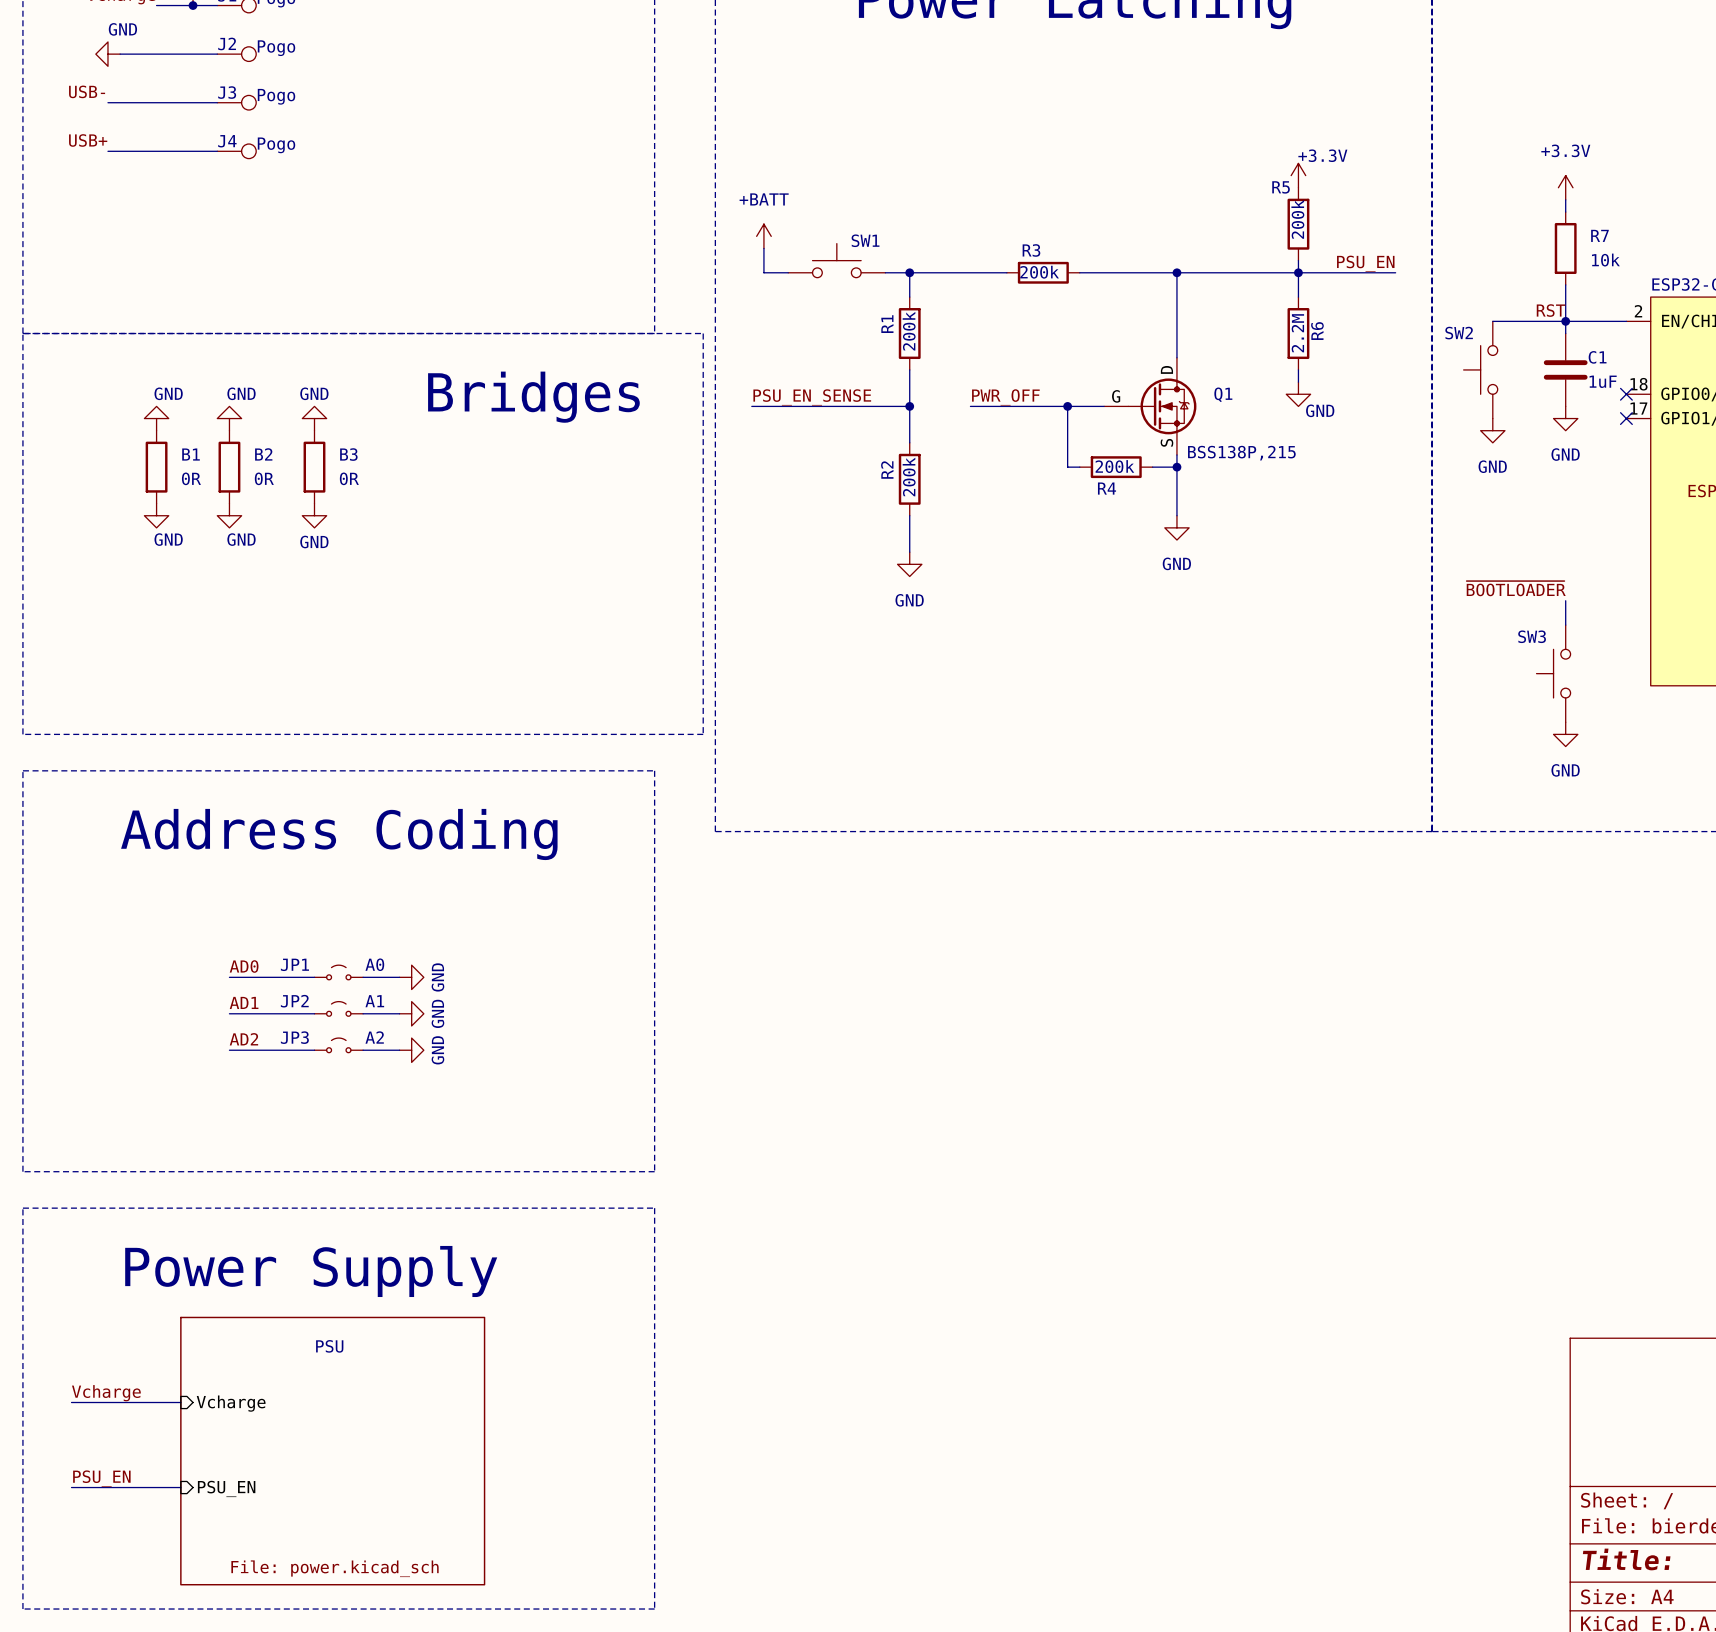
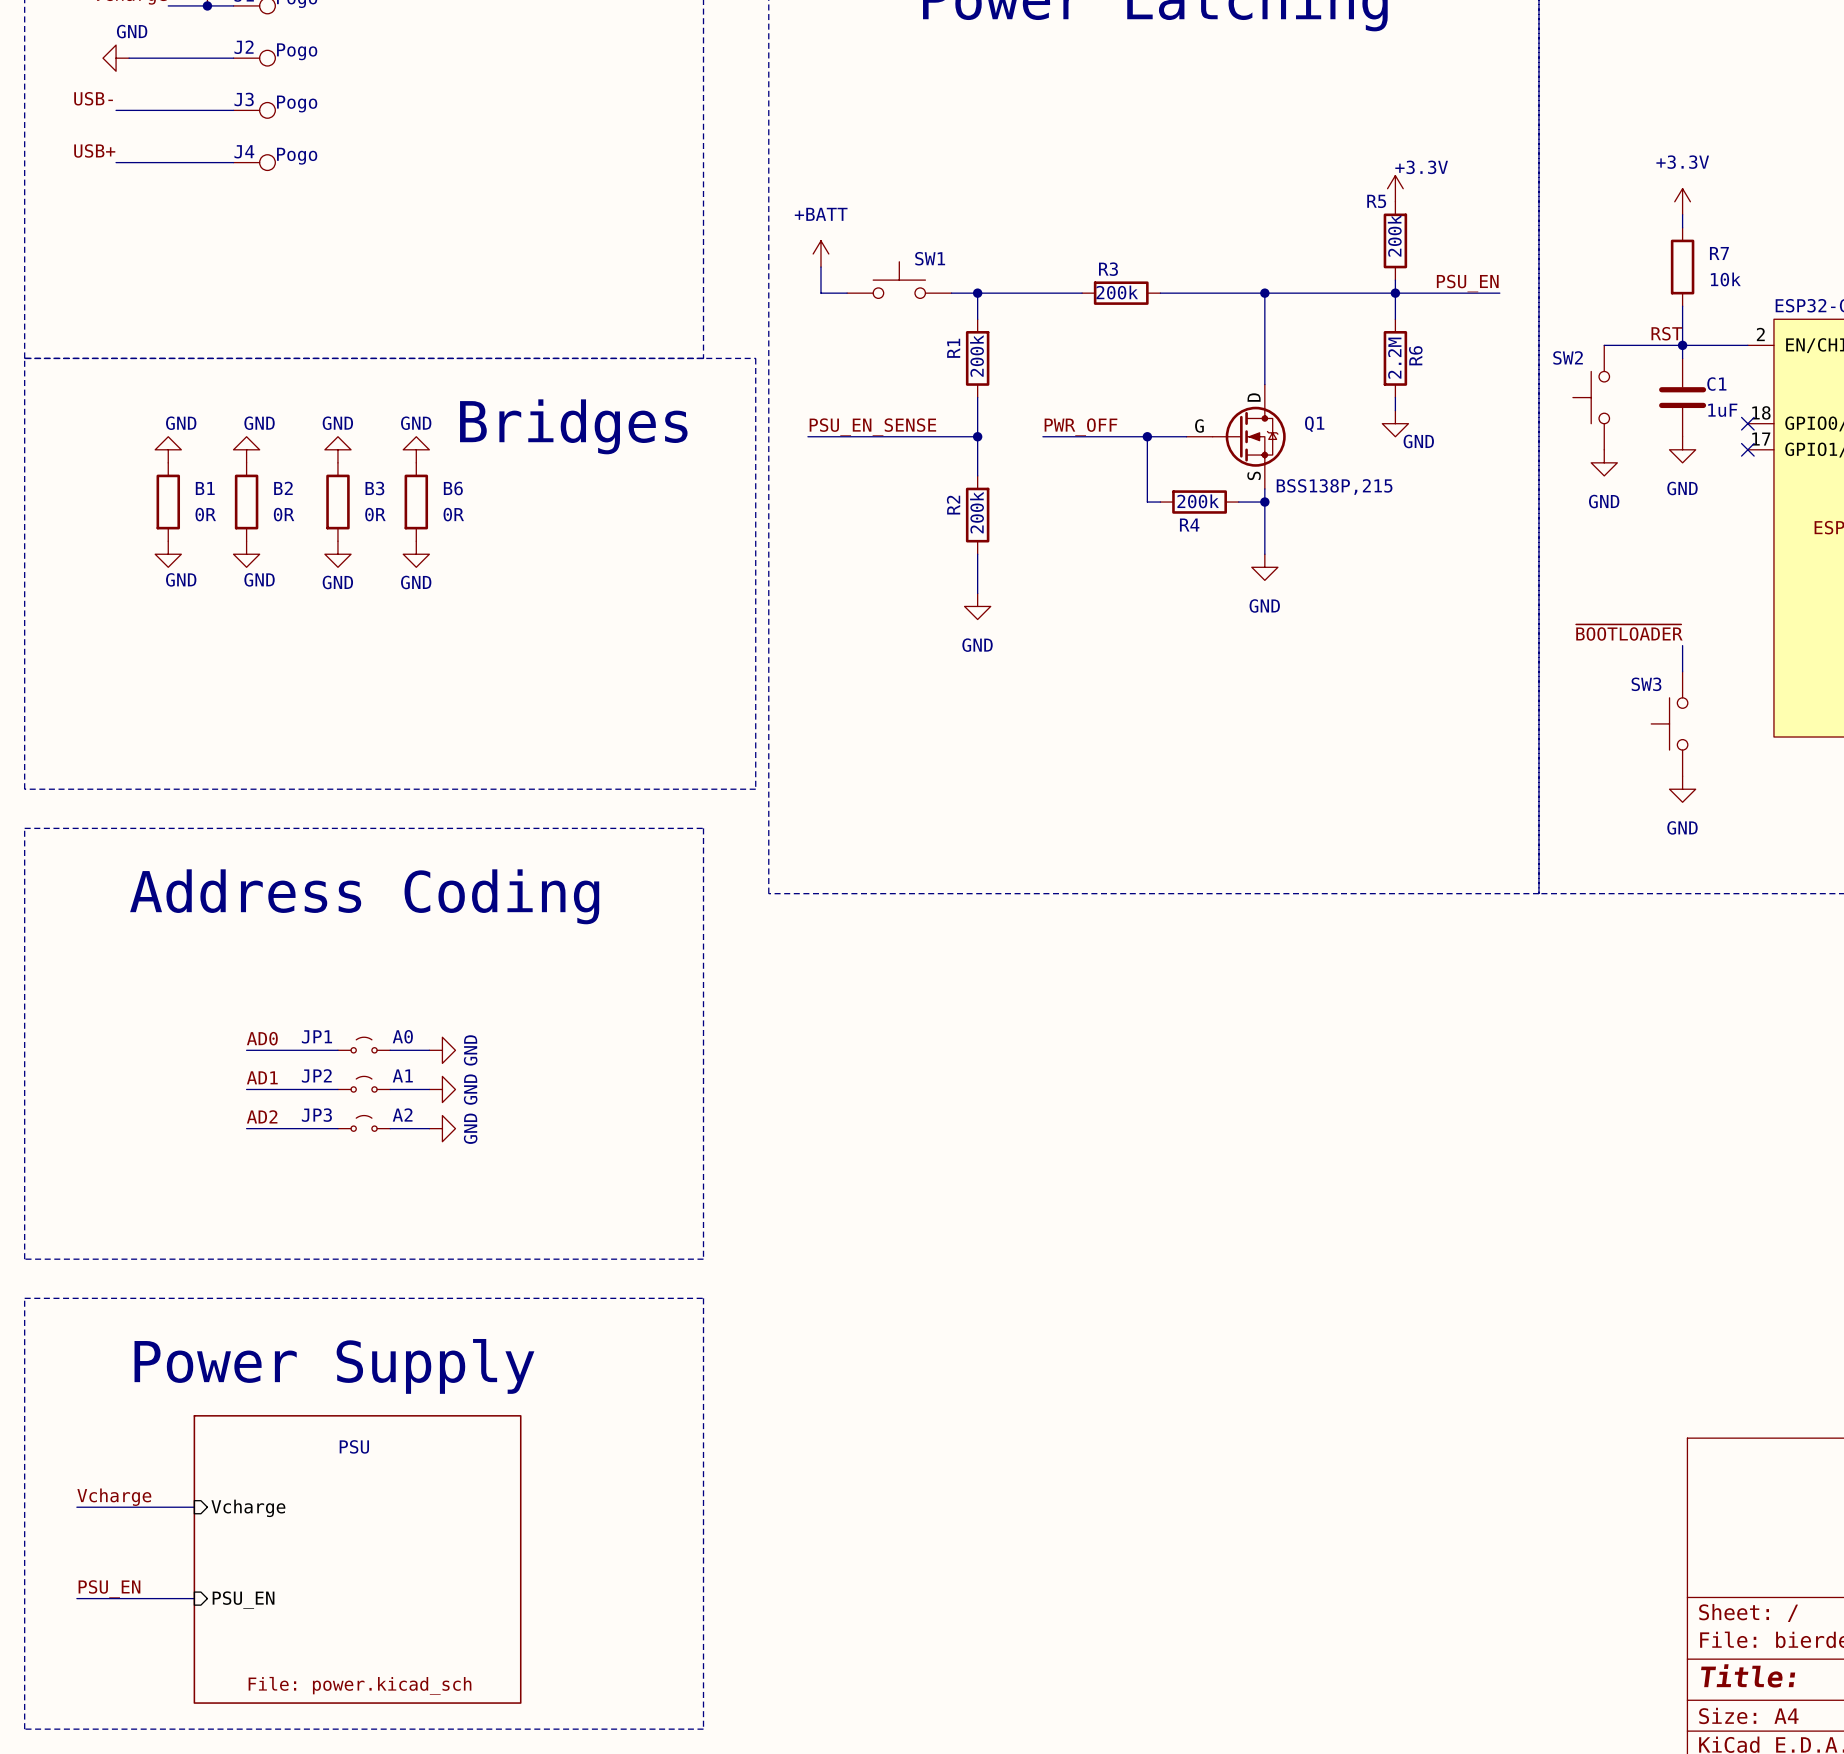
power symbol: none -> GND (416, 449)
B6: none -> 0R (416, 502)
power symbol: none -> GND (416, 554)

